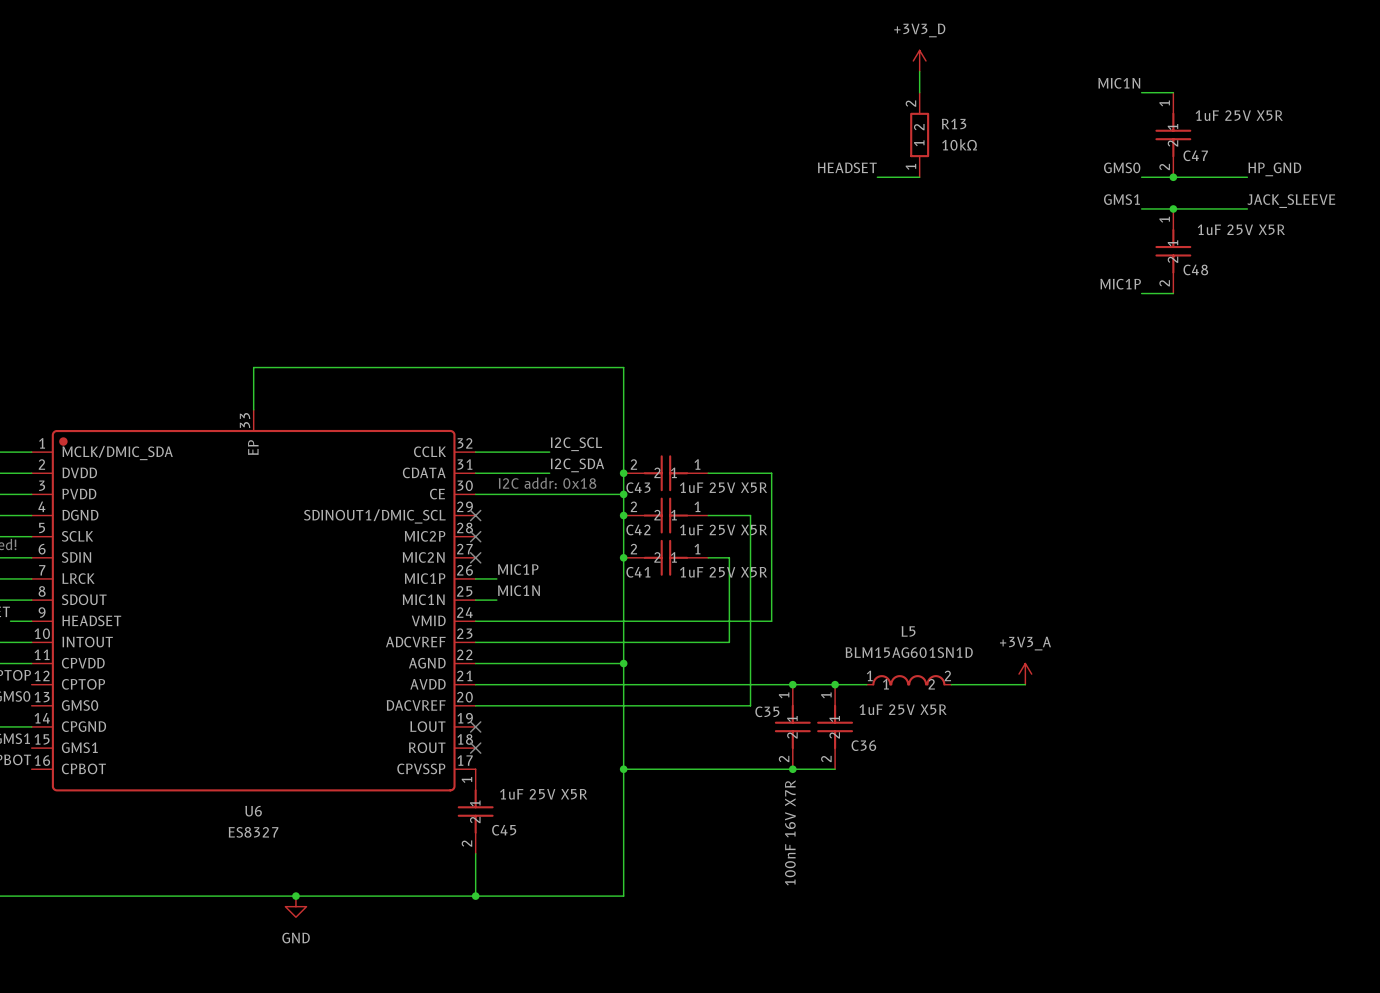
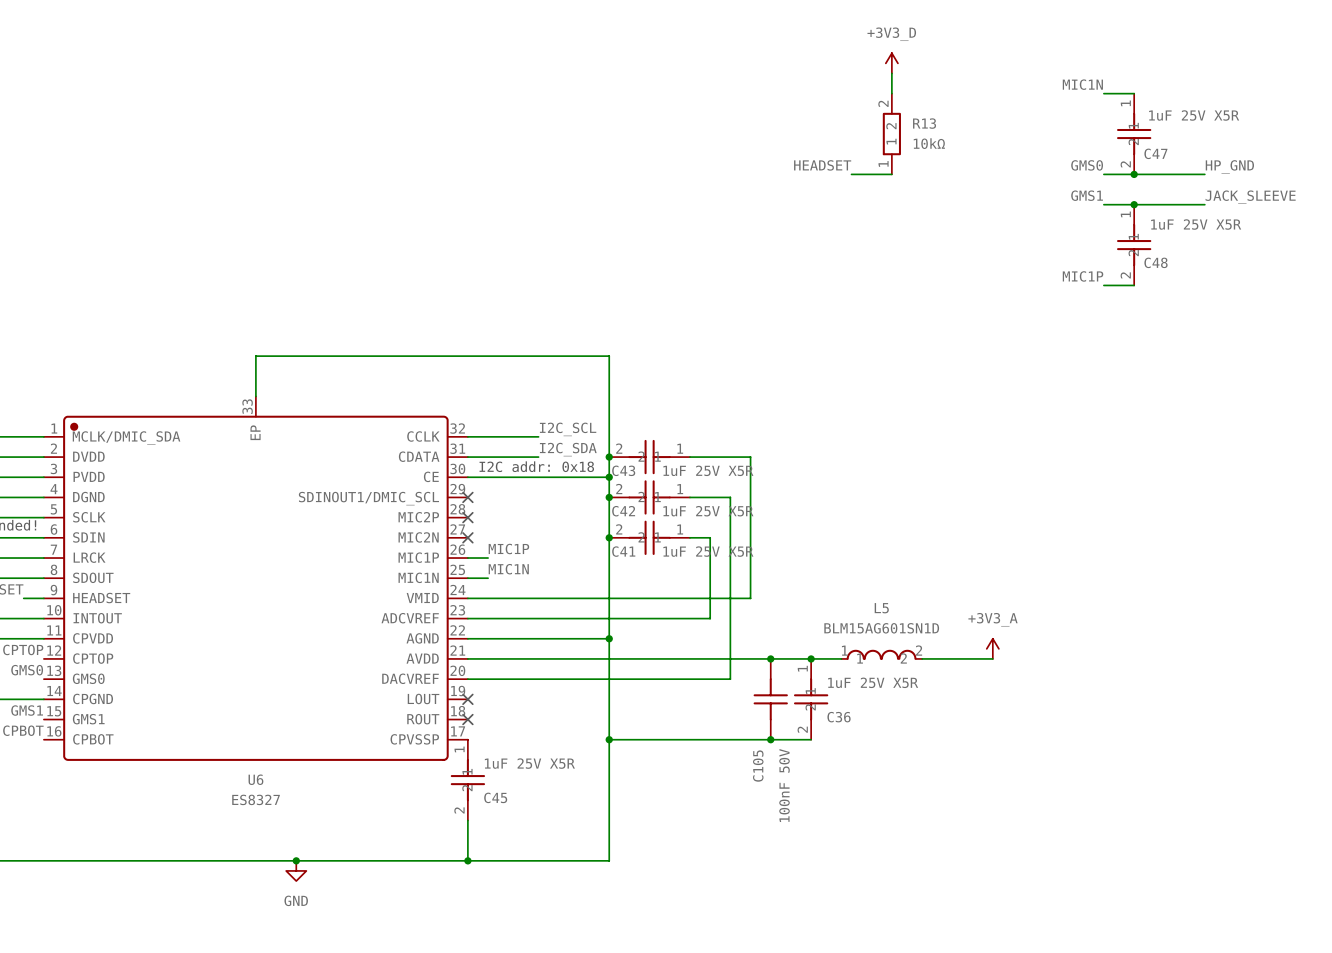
C35 pin number: 1 (784, 695) -> none
C35 name: C35 (767, 711) -> C105 (758, 766)
C35 pin name: 1 (792, 718) -> none
C35 pin name: 2 (792, 735) -> none
C35 pin number: 2 (784, 758) -> none
C35 value: 100nF 16V X7R (790, 832) -> 100nF 50V (784, 785)

